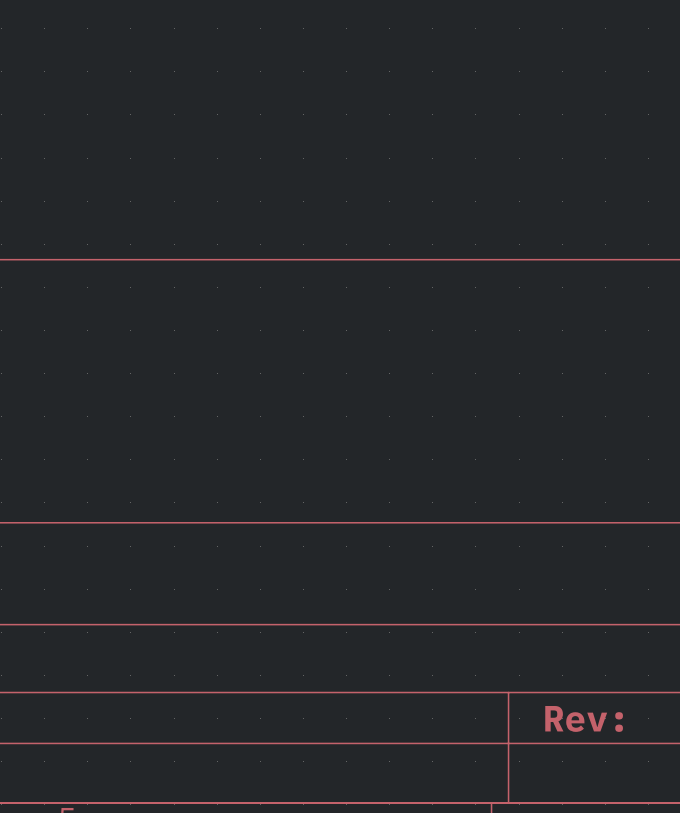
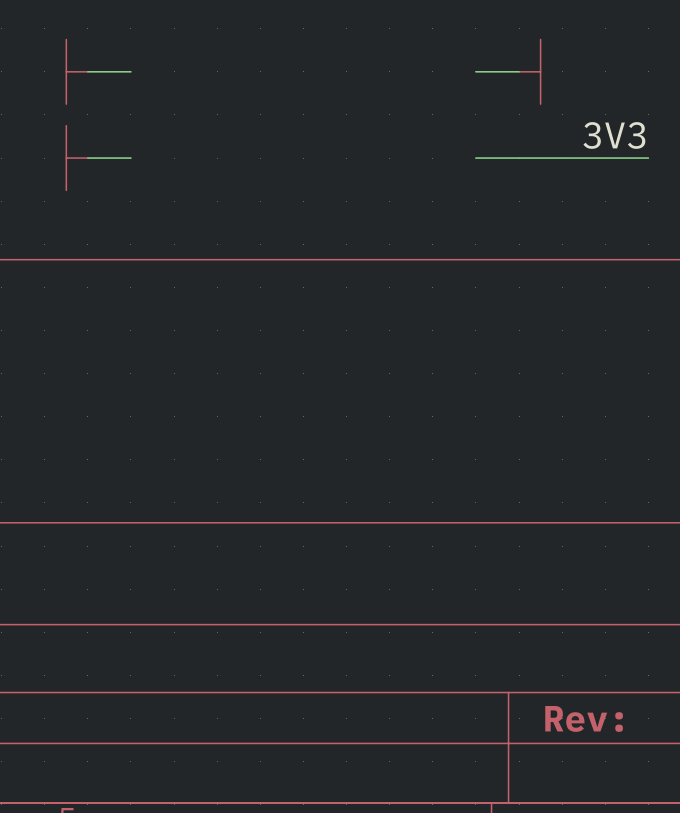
power symbol: none -> (77, 71)
wire: none -> (87, 71) (130, 71)
wire: none -> (475, 71) (519, 71)
power symbol: none -> (529, 71)
label: none -> 3V3 (614, 135)
power symbol: none -> (77, 158)
wire: none -> (87, 158) (130, 158)
wire: none -> (475, 158) (648, 158)

